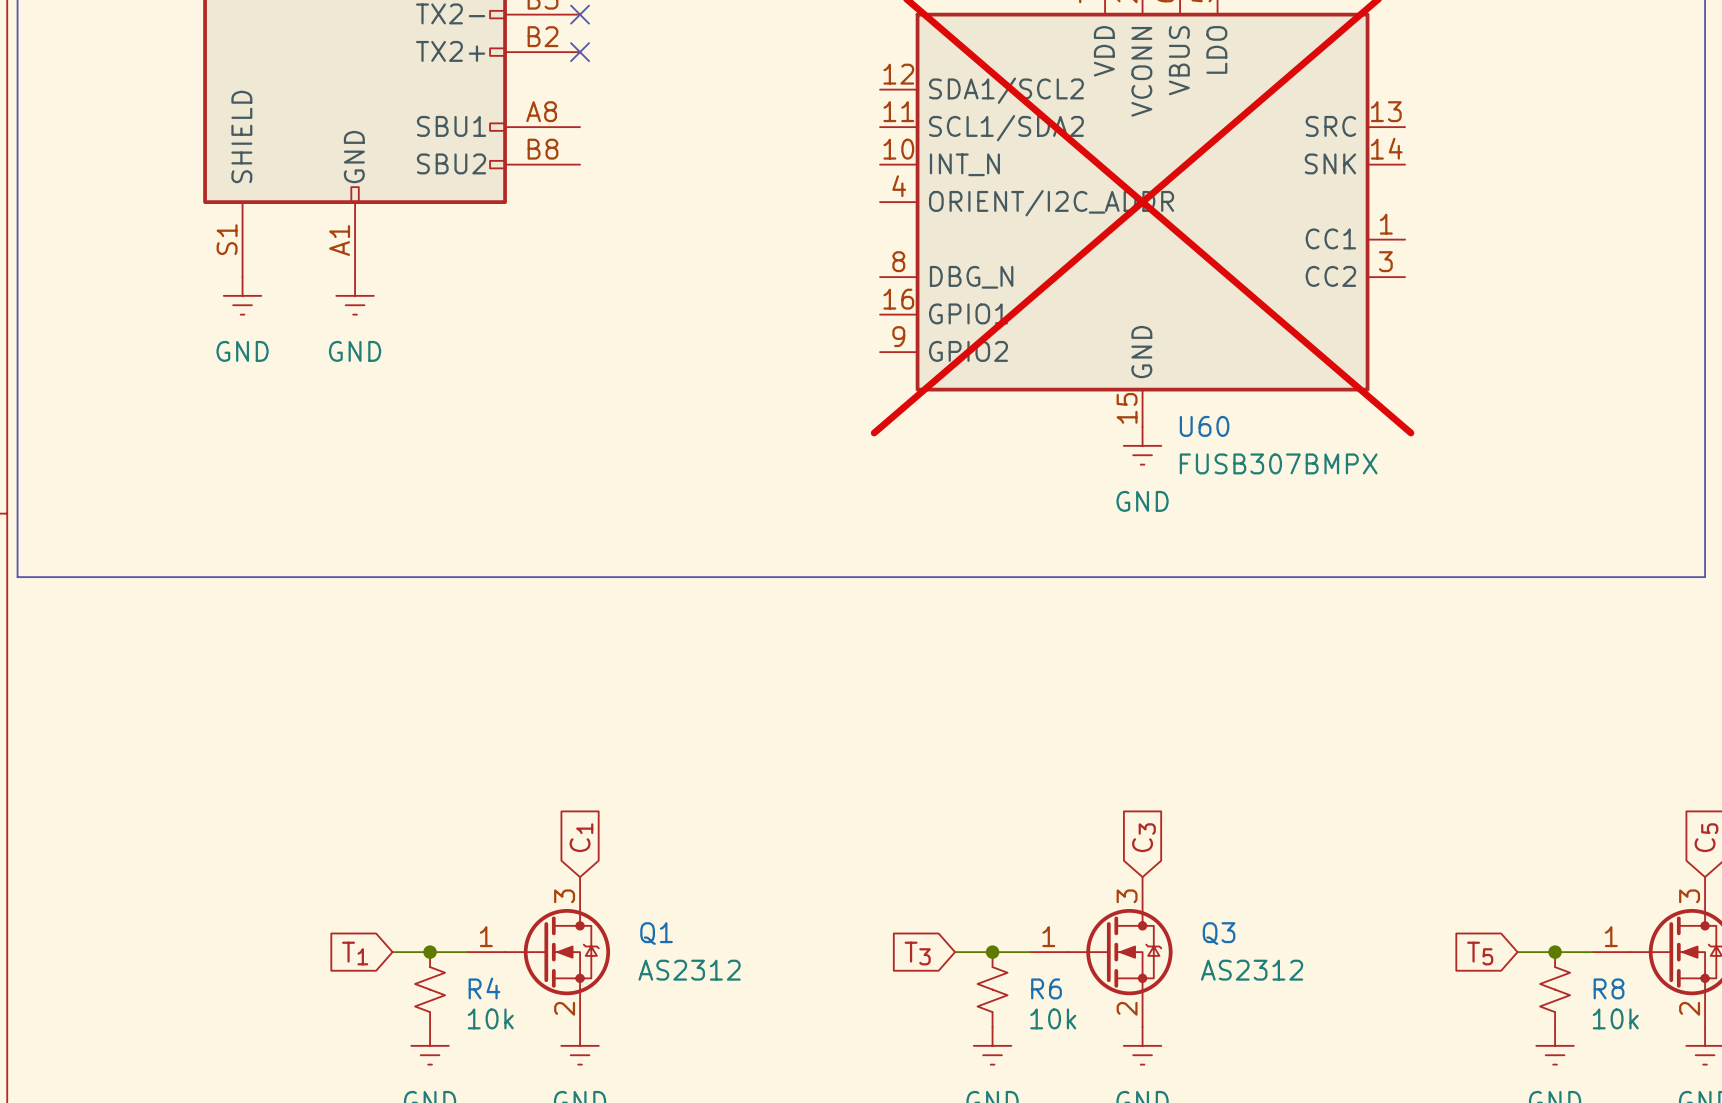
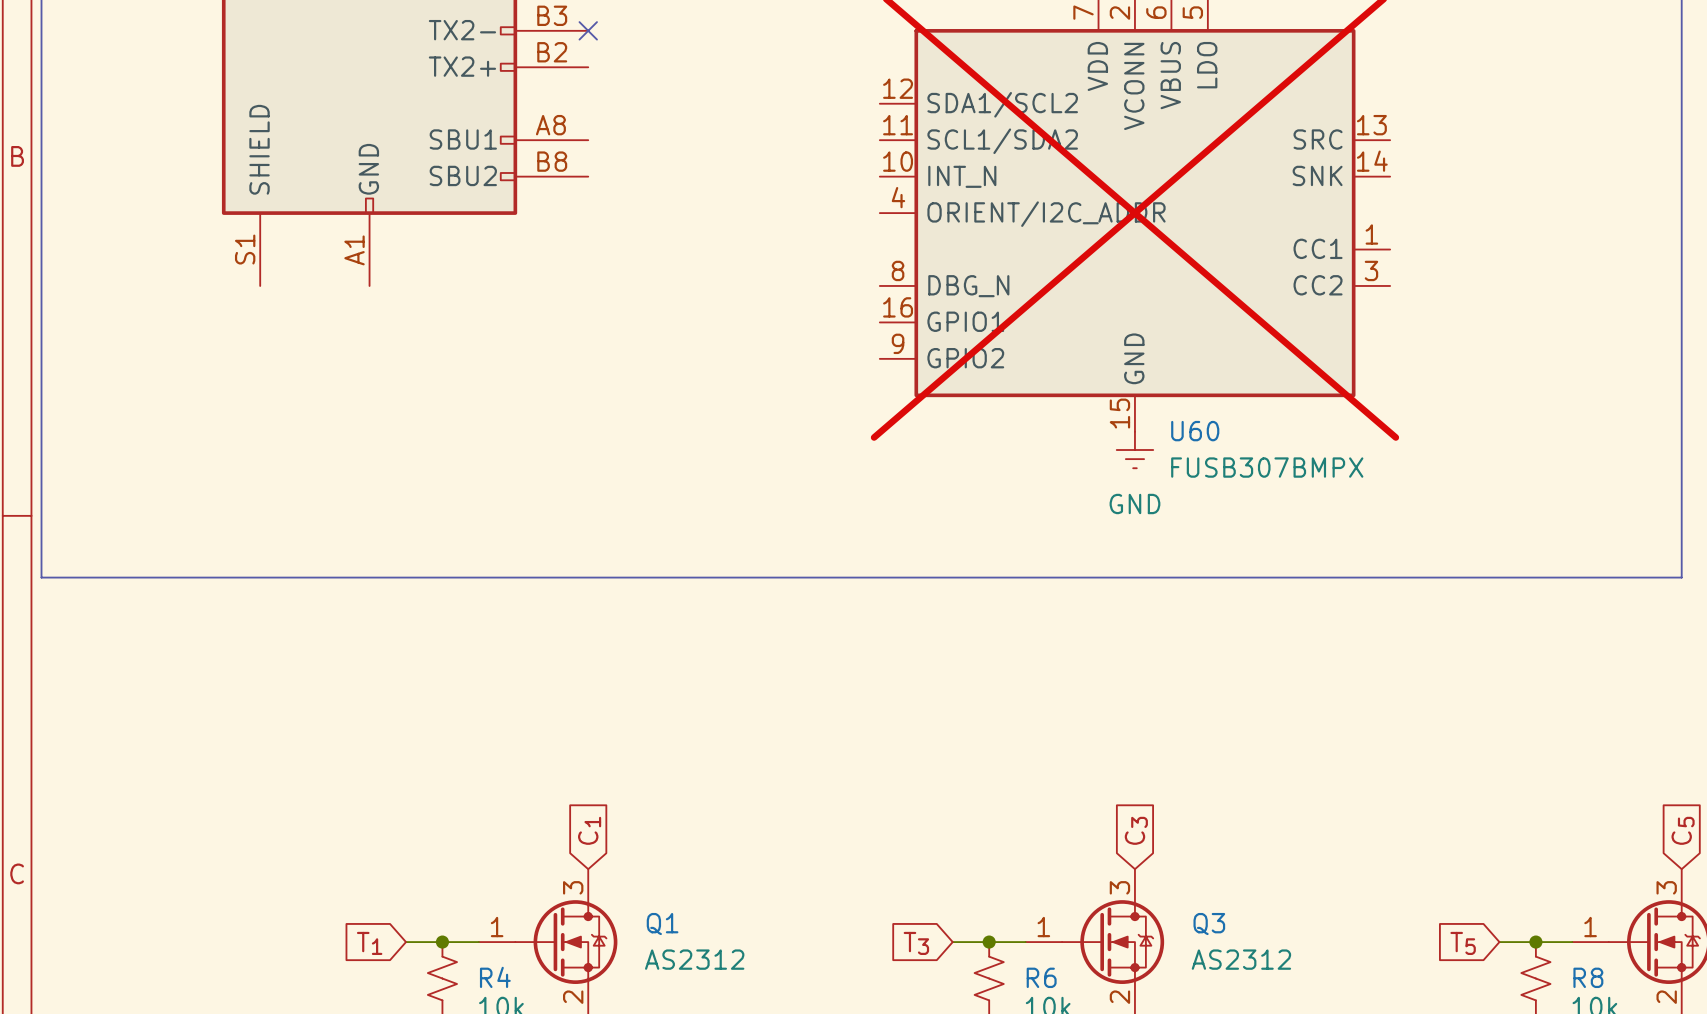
no-connect mark: (580, 52) -> none
power symbol: GND (242, 295) -> none
power symbol: GND (355, 295) -> none

